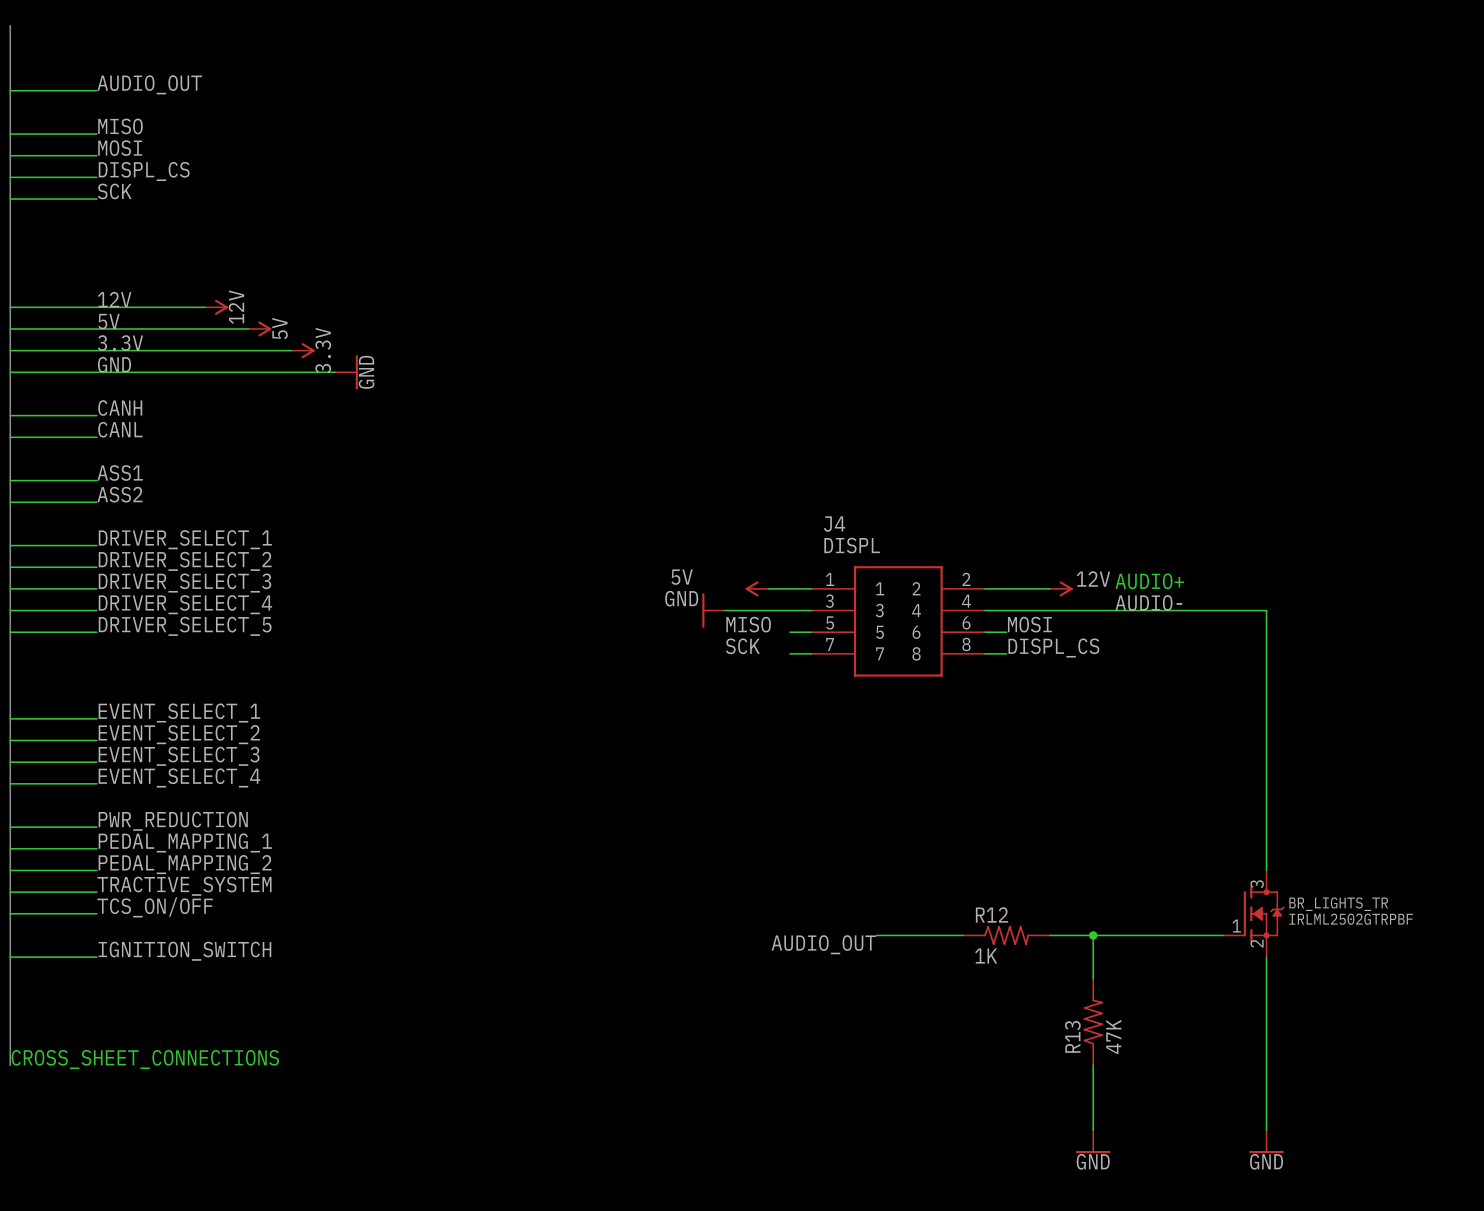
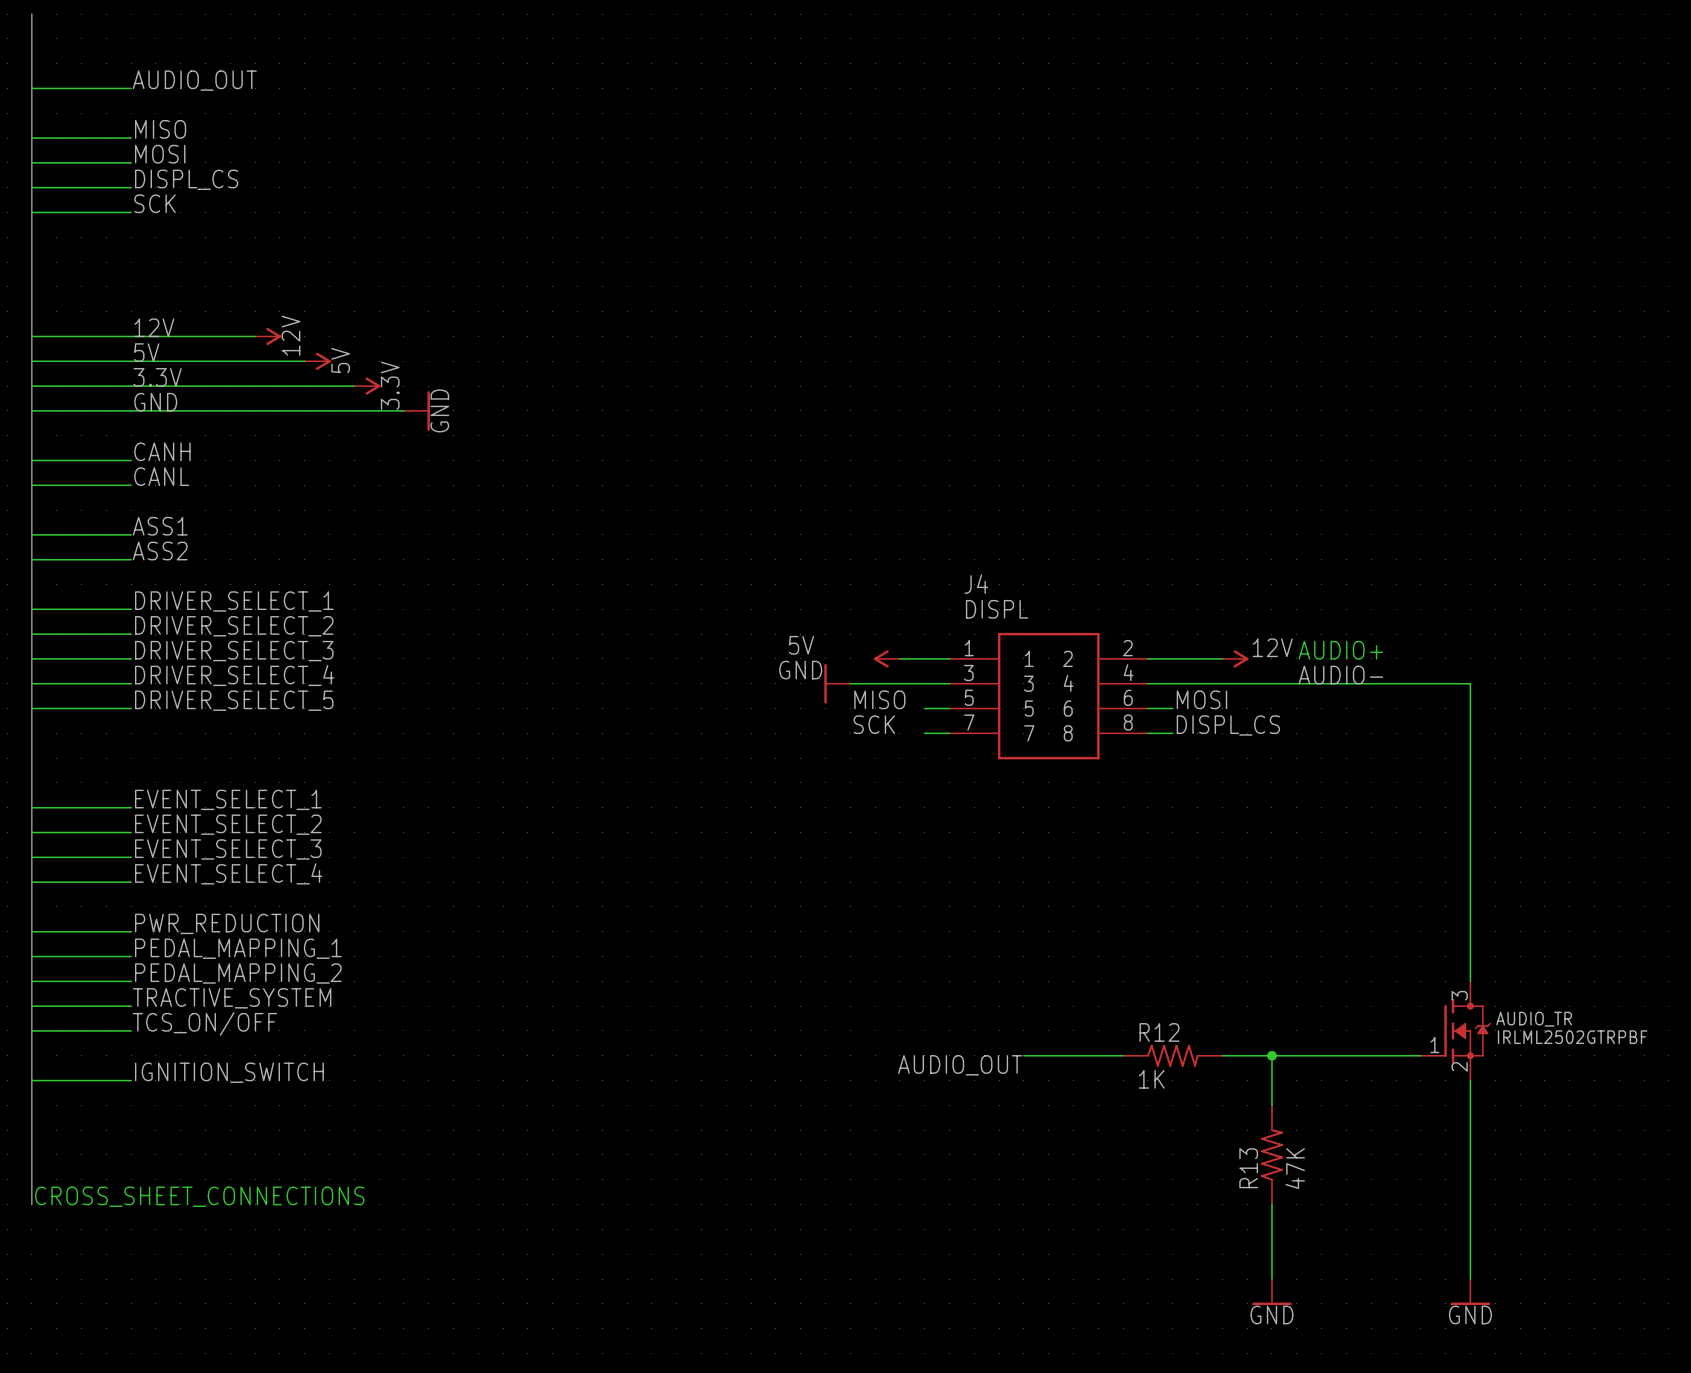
BR_LIGHTS_TR name: BR_LIGHTS_TR (1338, 904) -> AUDIO_TR (1534, 1019)

